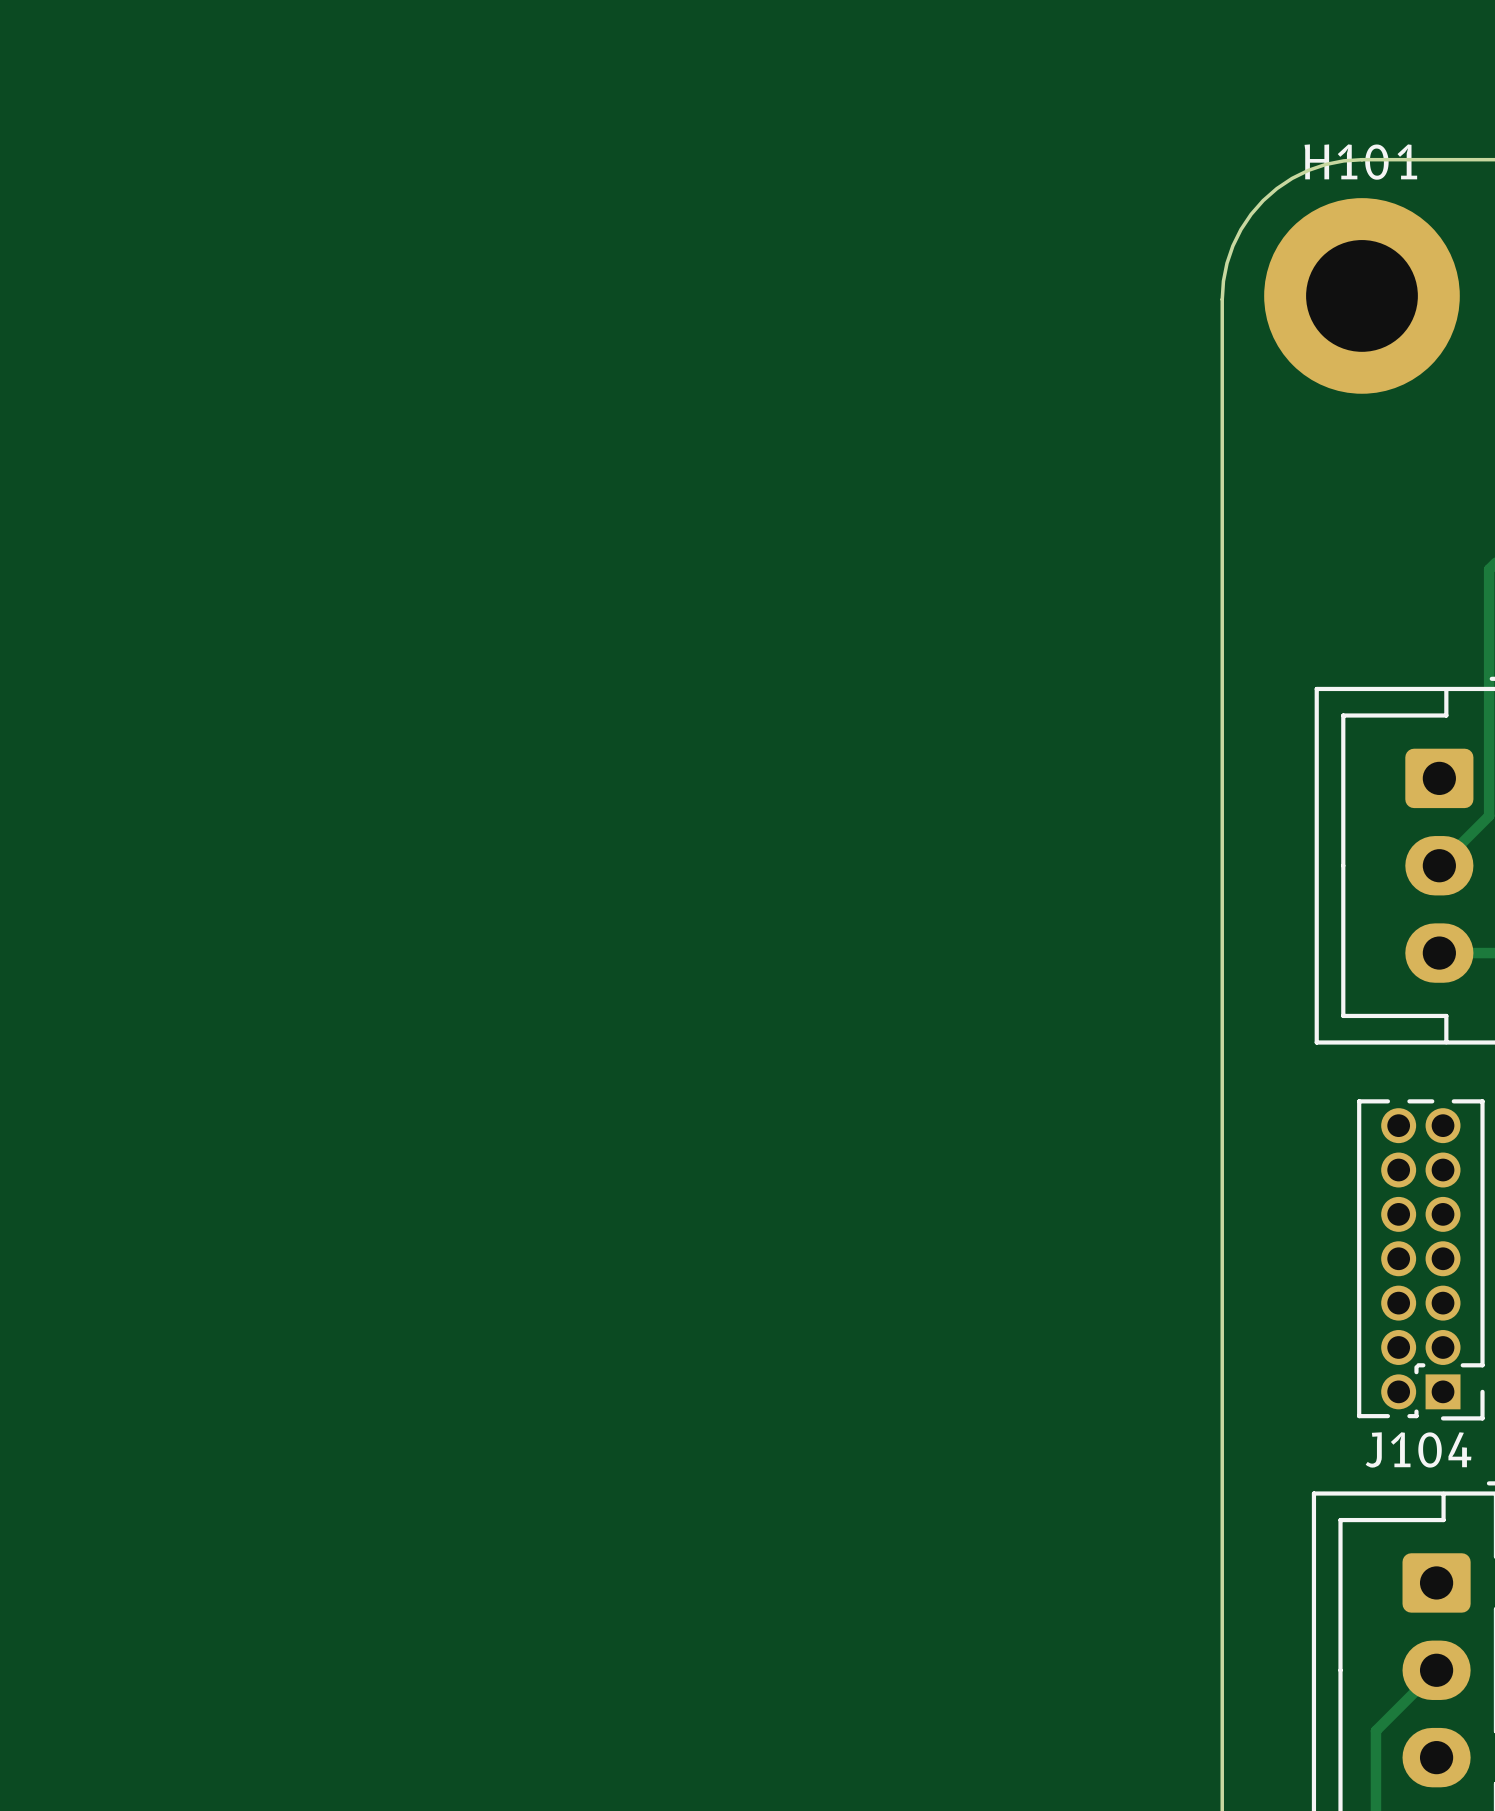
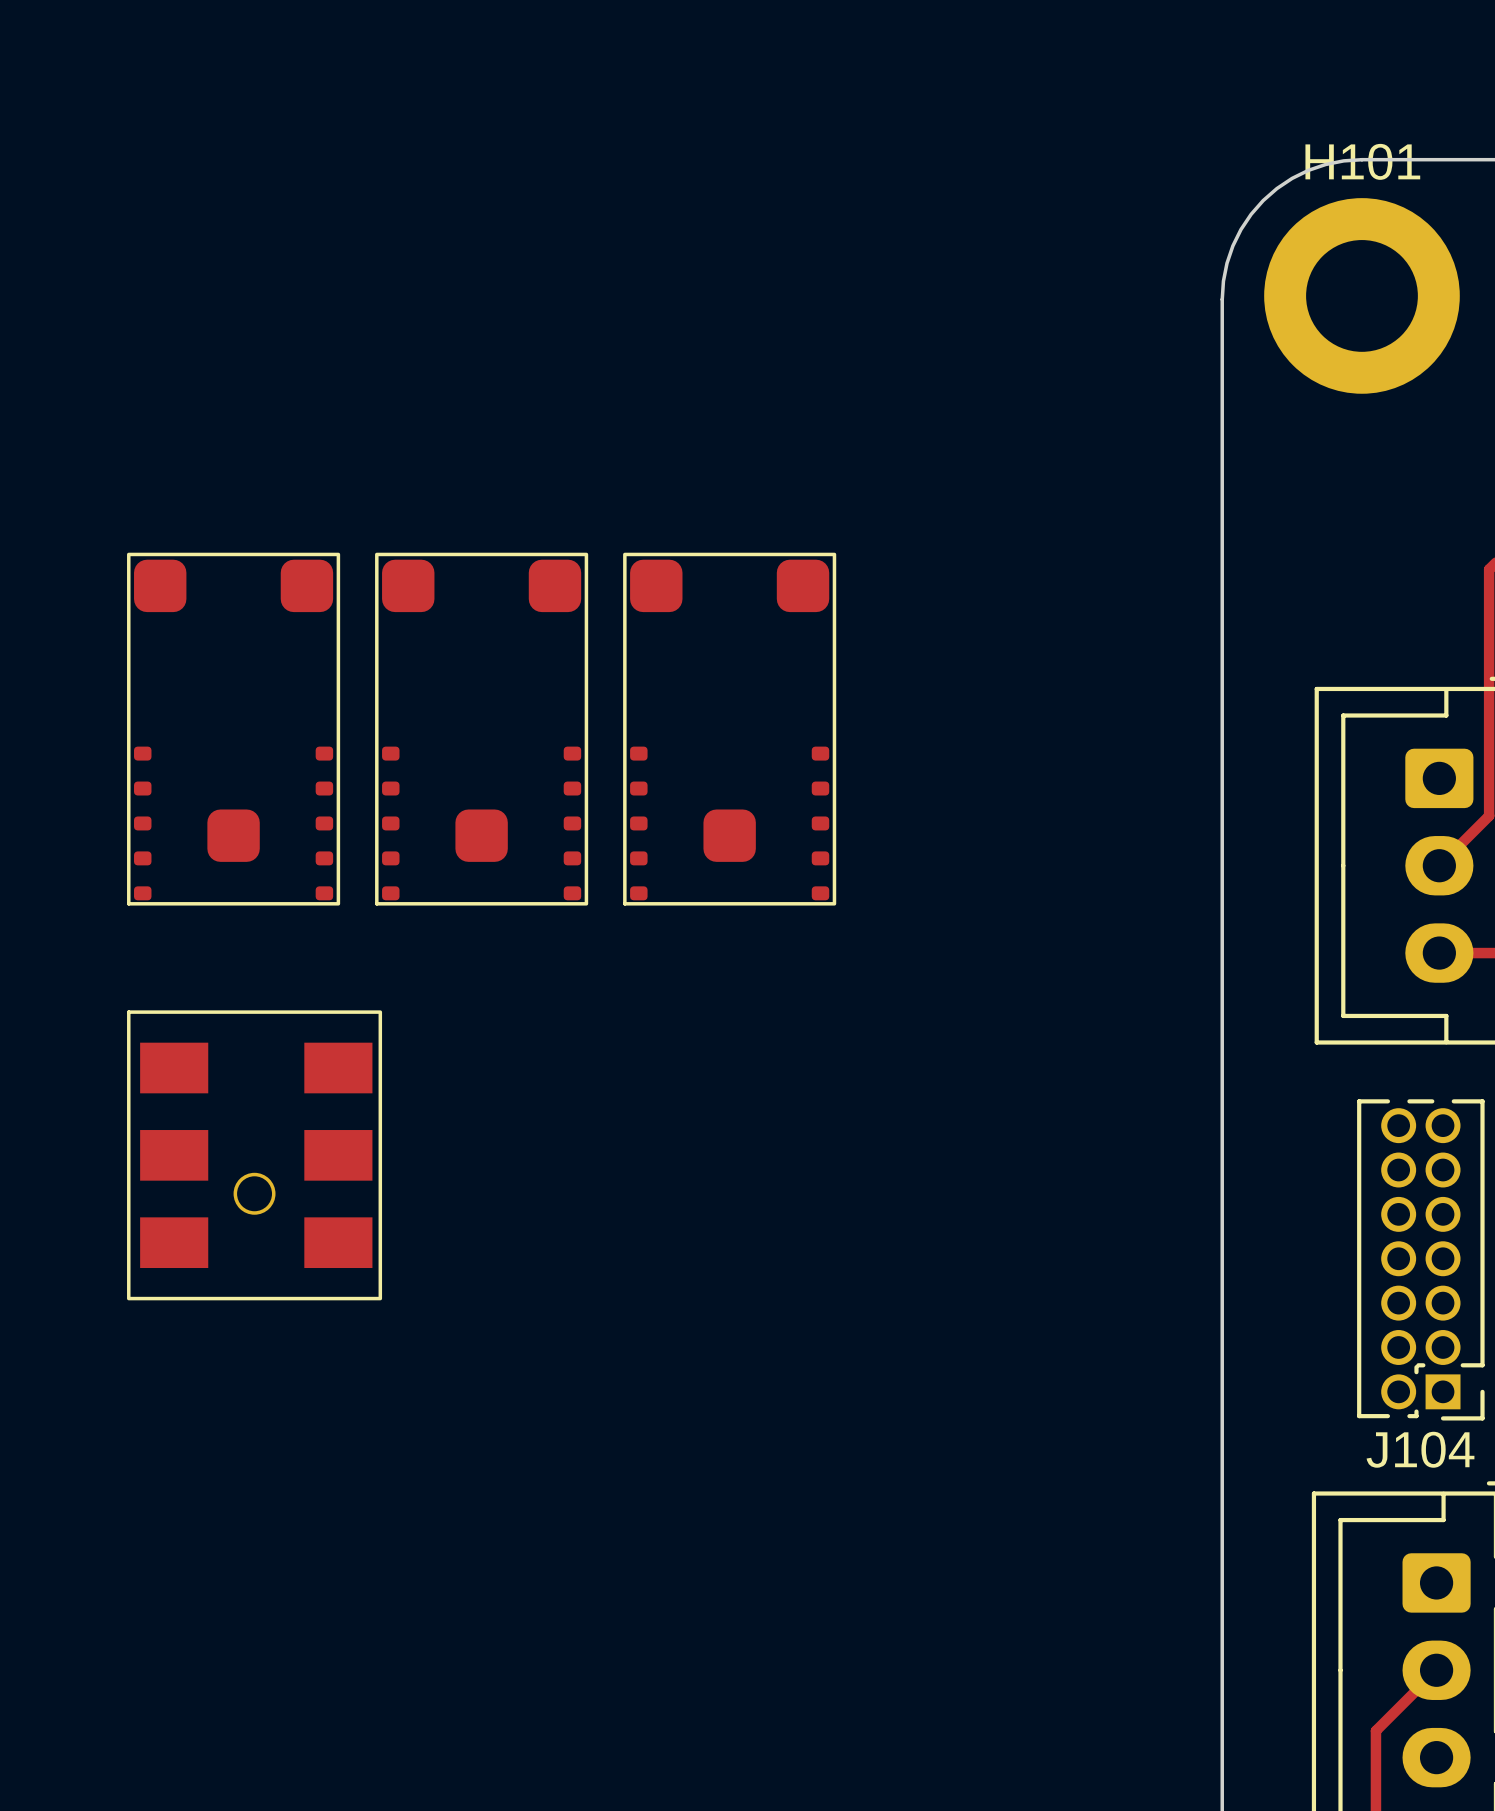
part: none -> (233, 729)
part: none -> (481, 729)
part: none -> (729, 729)
part: none -> (254, 1155)

